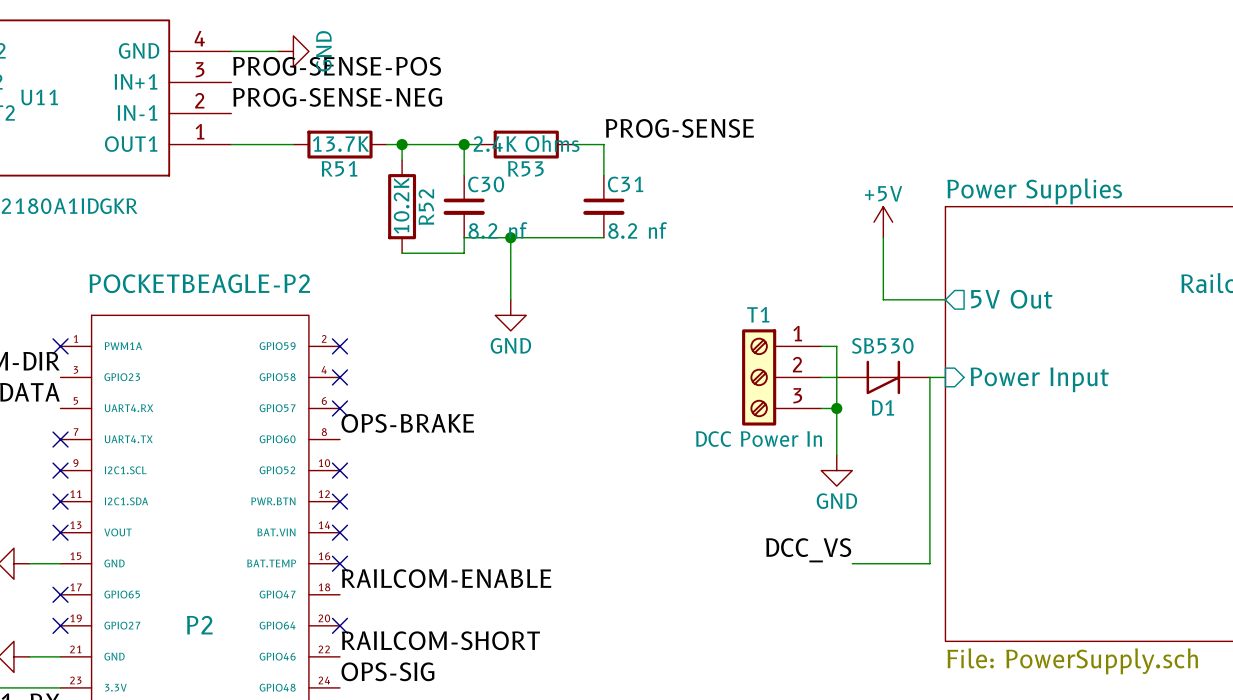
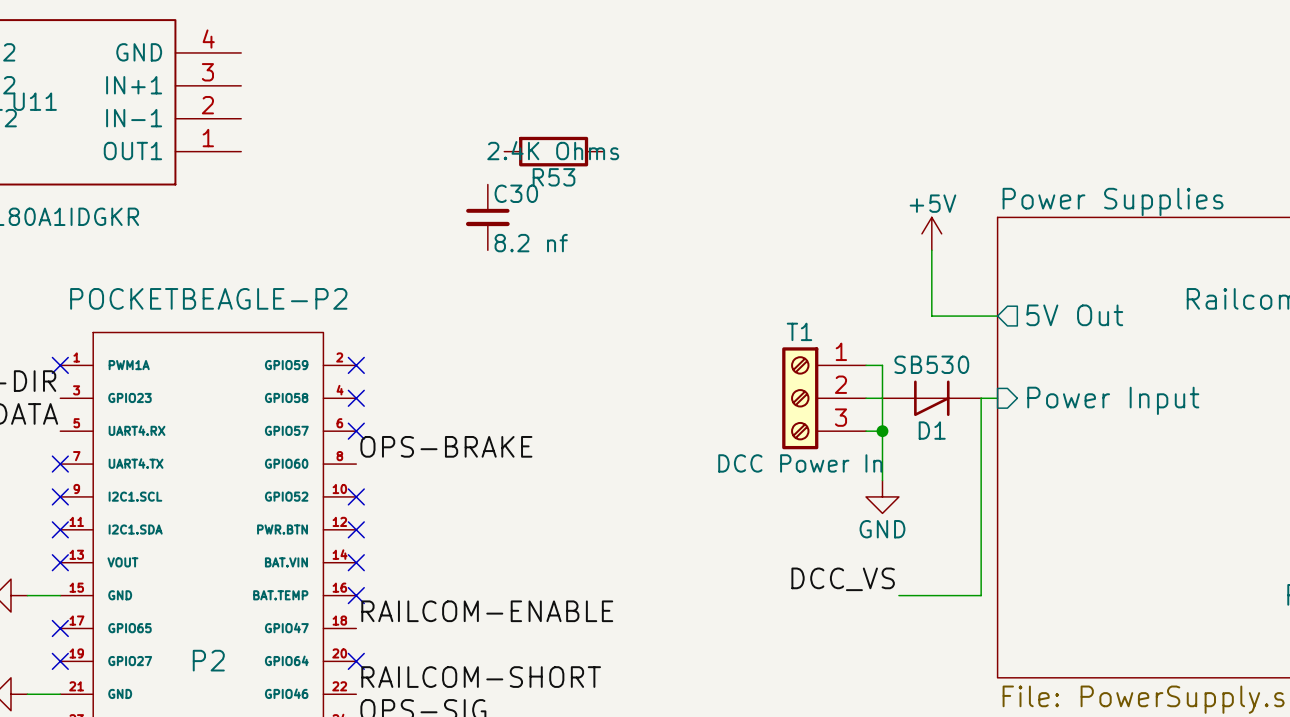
wire: (231, 51) (277, 51) -> none
power symbol: GND (293, 51) -> none
label: PROG-SENSE-POS (337, 66) -> none
label: PROG-SENSE-NEG (337, 97) -> none
label: PROG-SENSE (679, 128) -> none
wire: (231, 144) (293, 144) -> none
R51: 13.7K (339, 144) -> none
wire: (386, 144) (479, 144) -> none
wire: (402, 144) (402, 160) -> none
junction: (402, 144) -> none
wire: (464, 144) (464, 175) -> none
junction: (464, 144) -> none
wire: (572, 144) (603, 144) (603, 175) -> none
R52: 10.2K (402, 206) -> none
C31: 8.2 nf (603, 206) -> none
wire: (510, 237) (510, 299) -> none
junction: (510, 237) -> none
wire: (603, 237) (464, 237) (464, 253) (402, 253) -> none
power symbol: GND (510, 315) -> none

